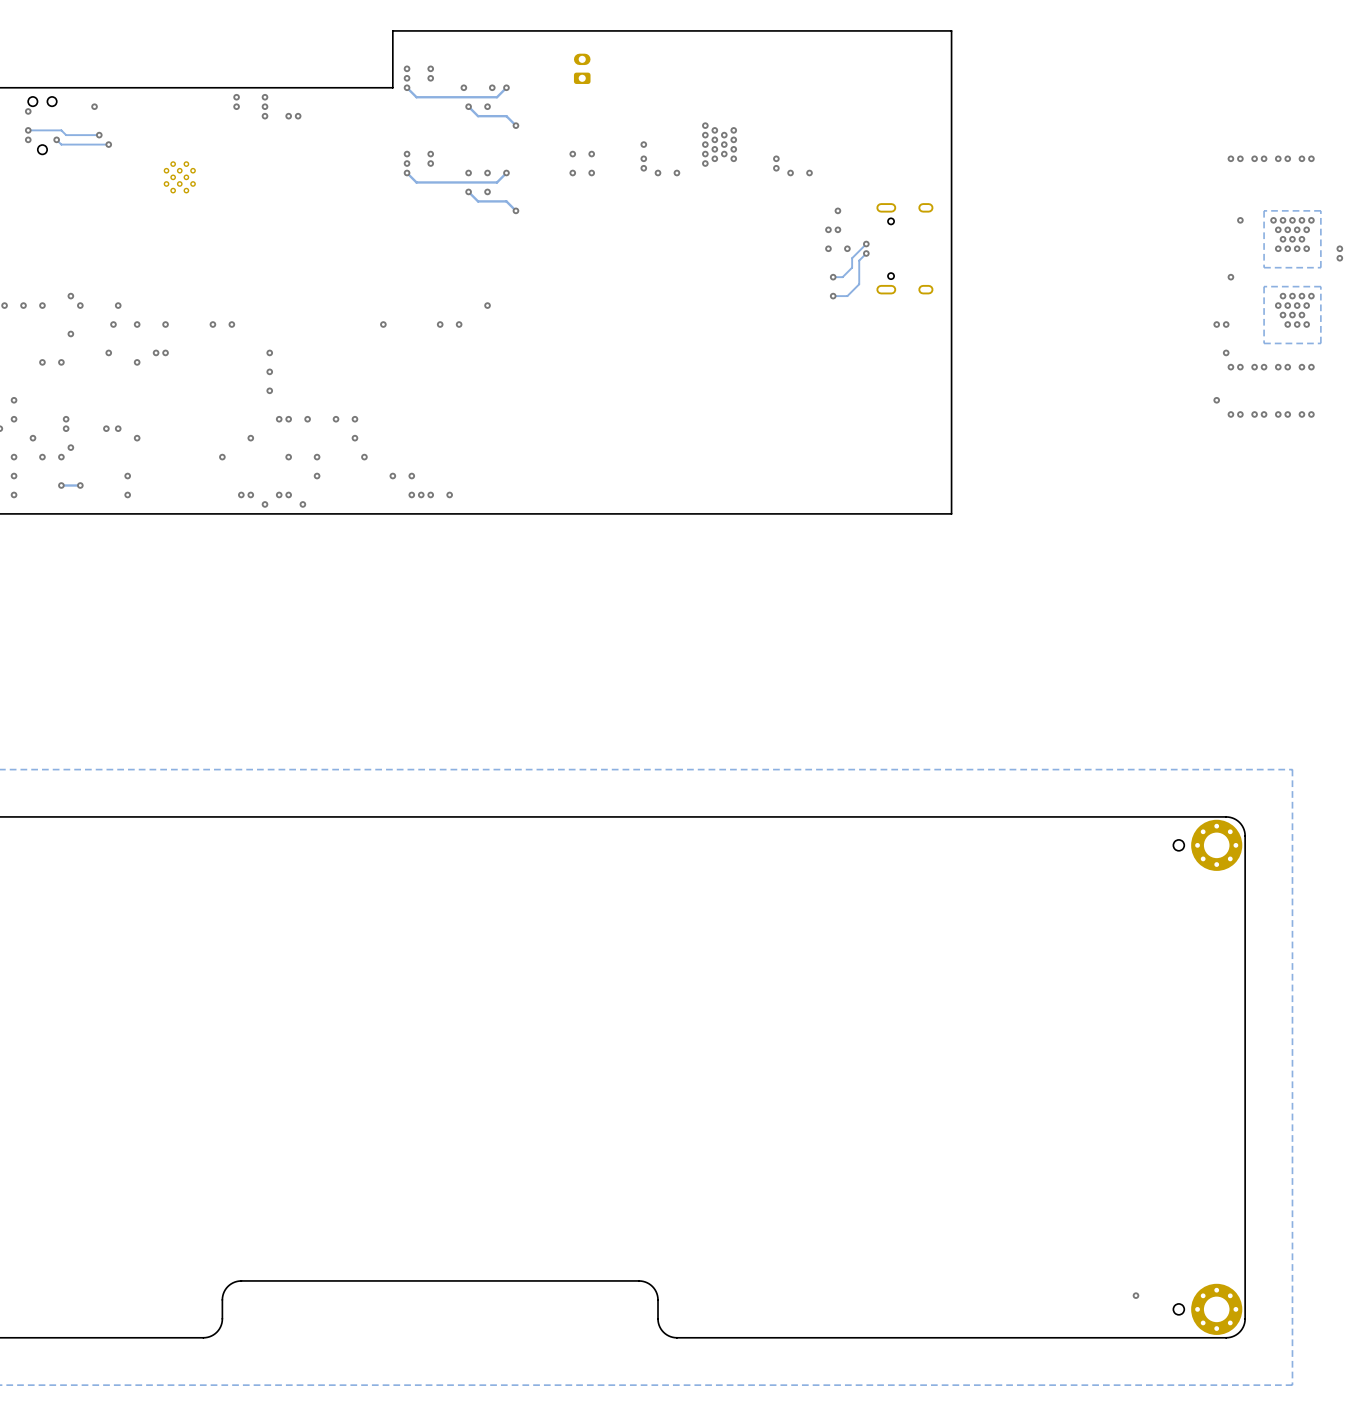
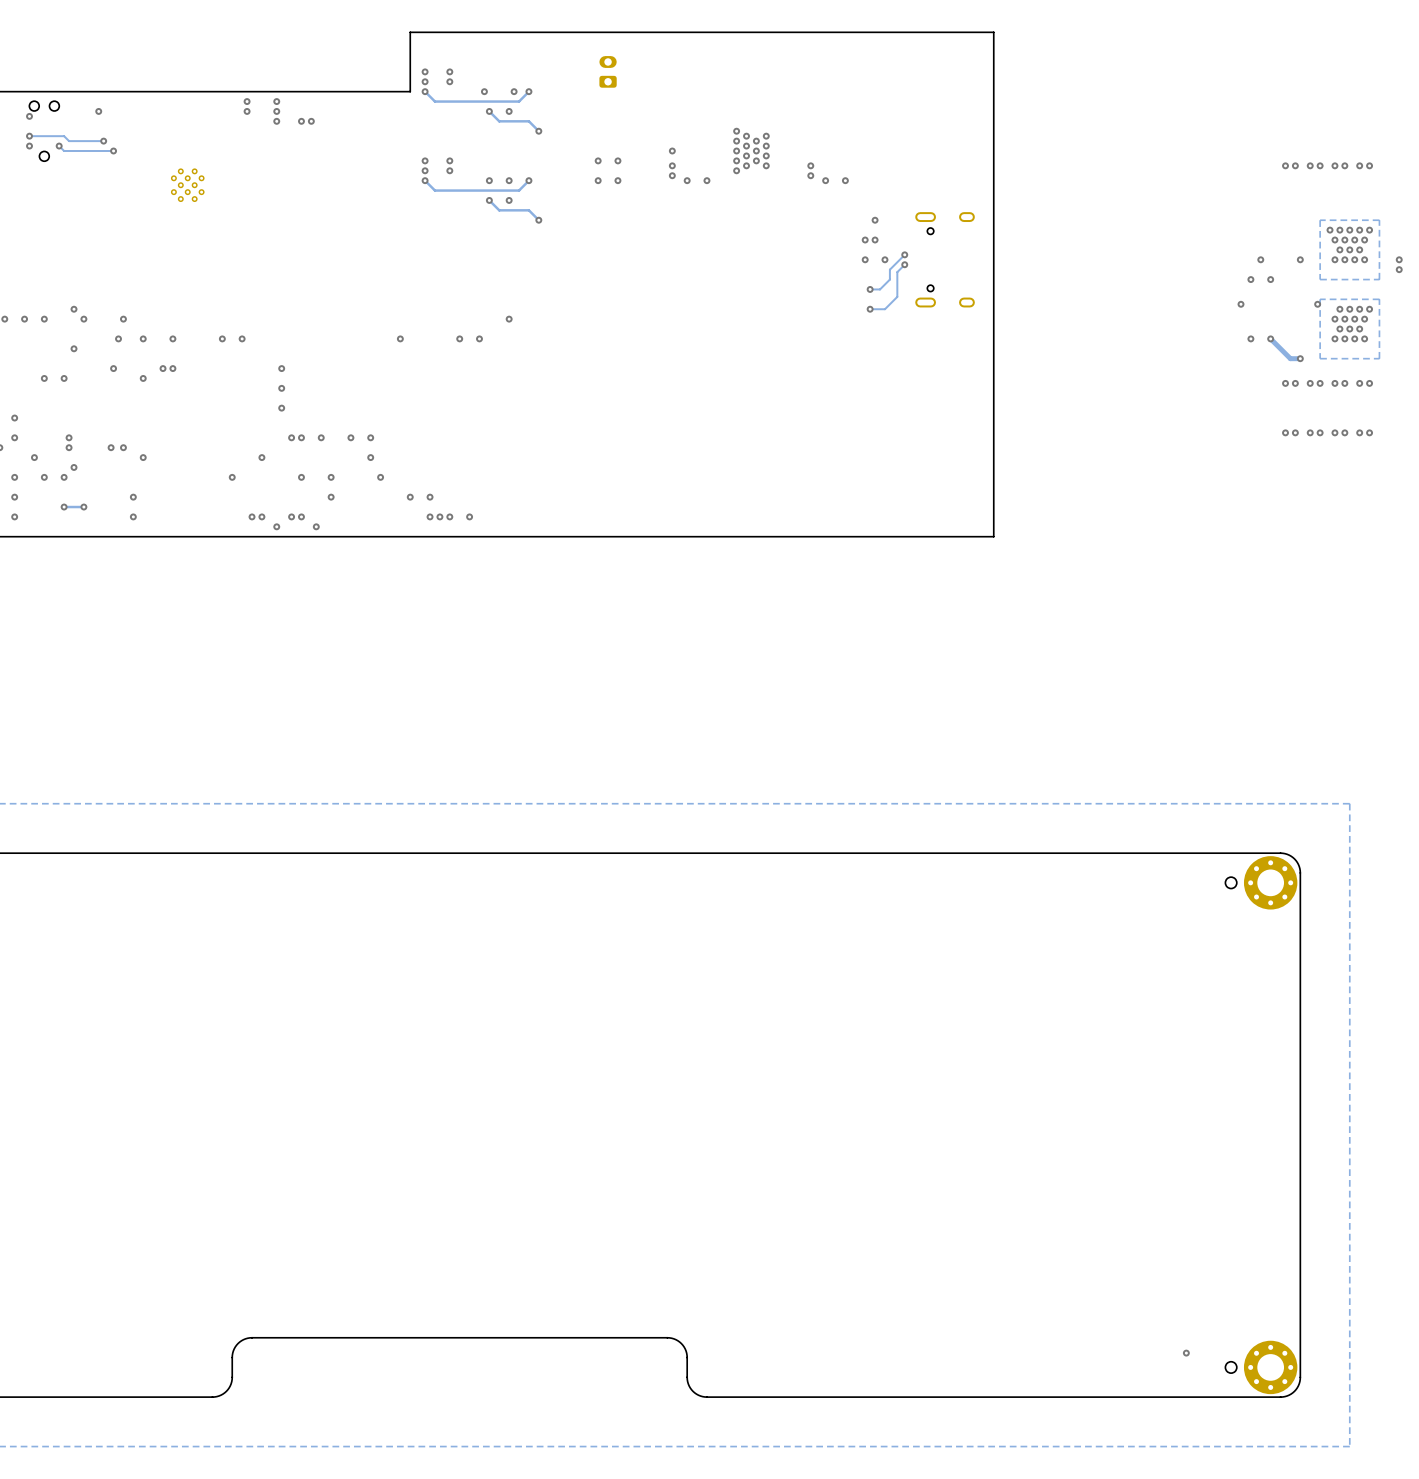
via: (1240, 220) -> none
via: none -> (1260, 259)
via: none -> (1300, 259)
via: none -> (1250, 279)
via: none -> (1270, 279)
via: (1230, 277) -> none
via: none -> (1241, 304)
via: none -> (1317, 304)
via: none -> (1250, 338)
track: none -> (1270, 338) (1290, 358) (1300, 358)
via: (1226, 324) -> none
via: none -> (1334, 338)
via: none -> (1300, 358)
via: (1226, 352) -> none
via: (1216, 400) -> none

